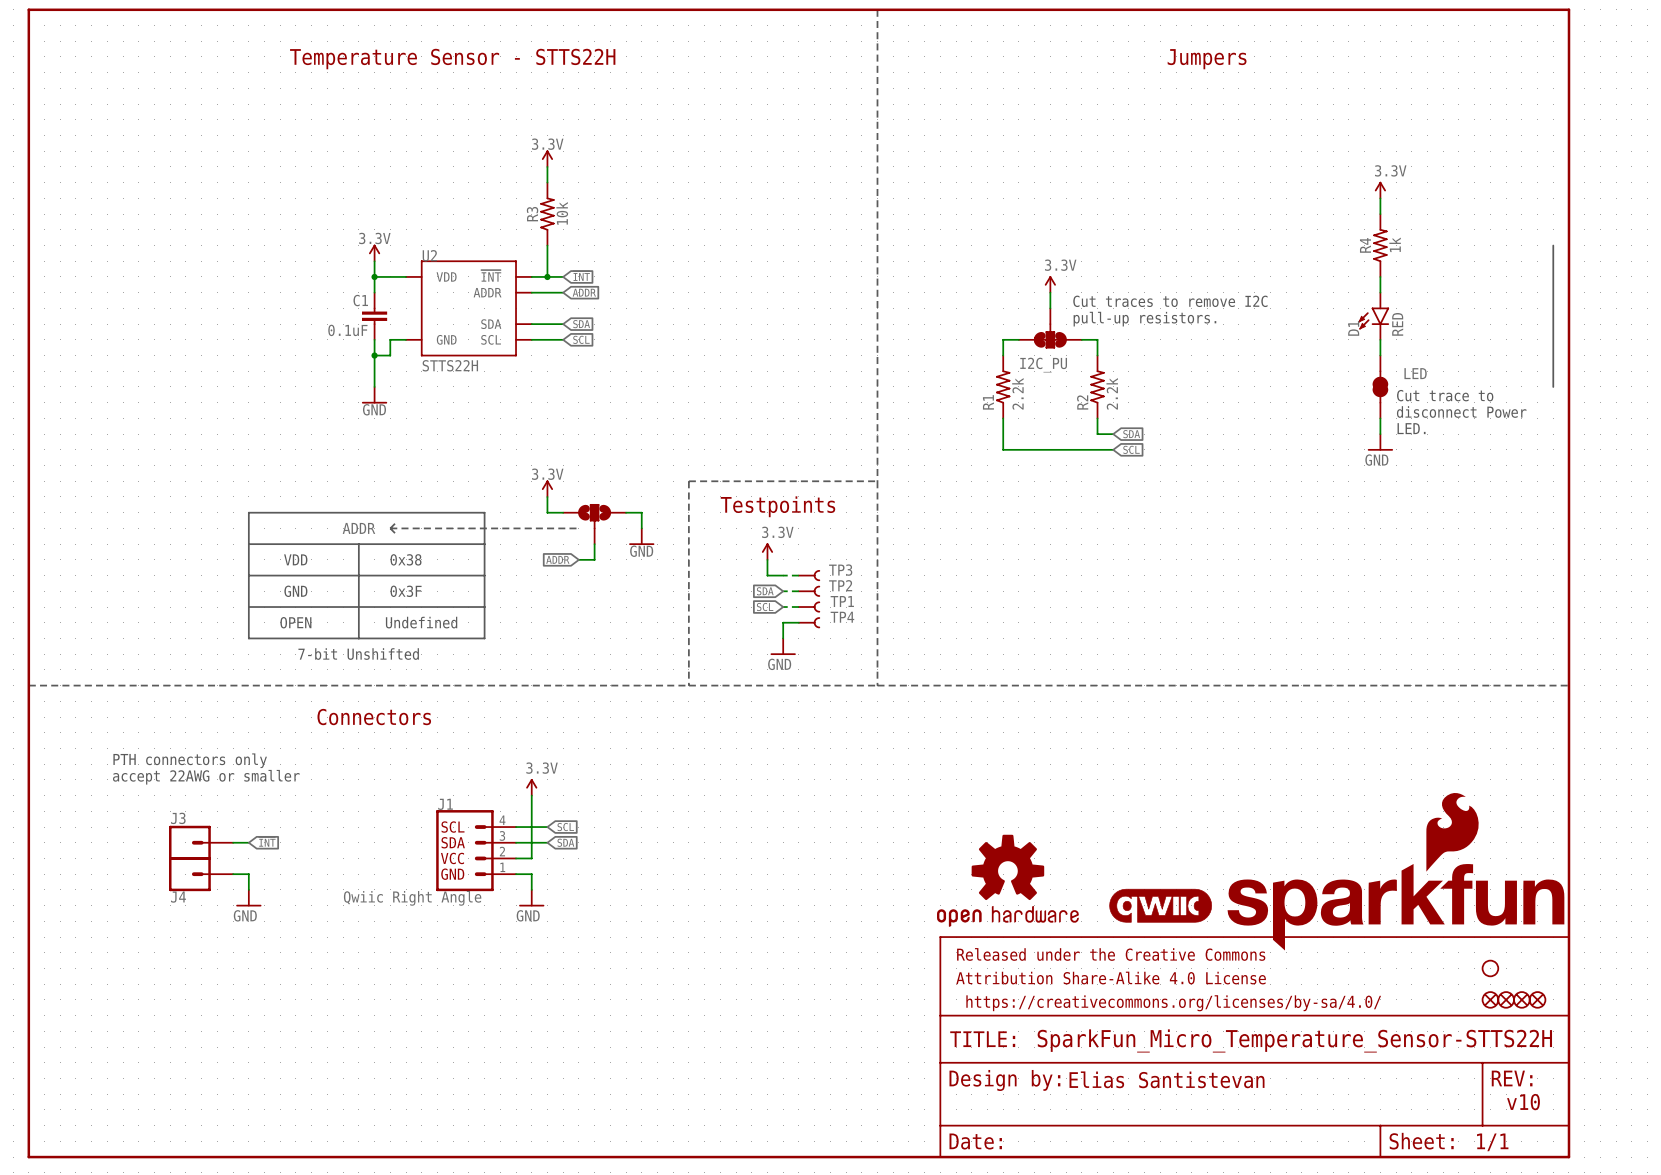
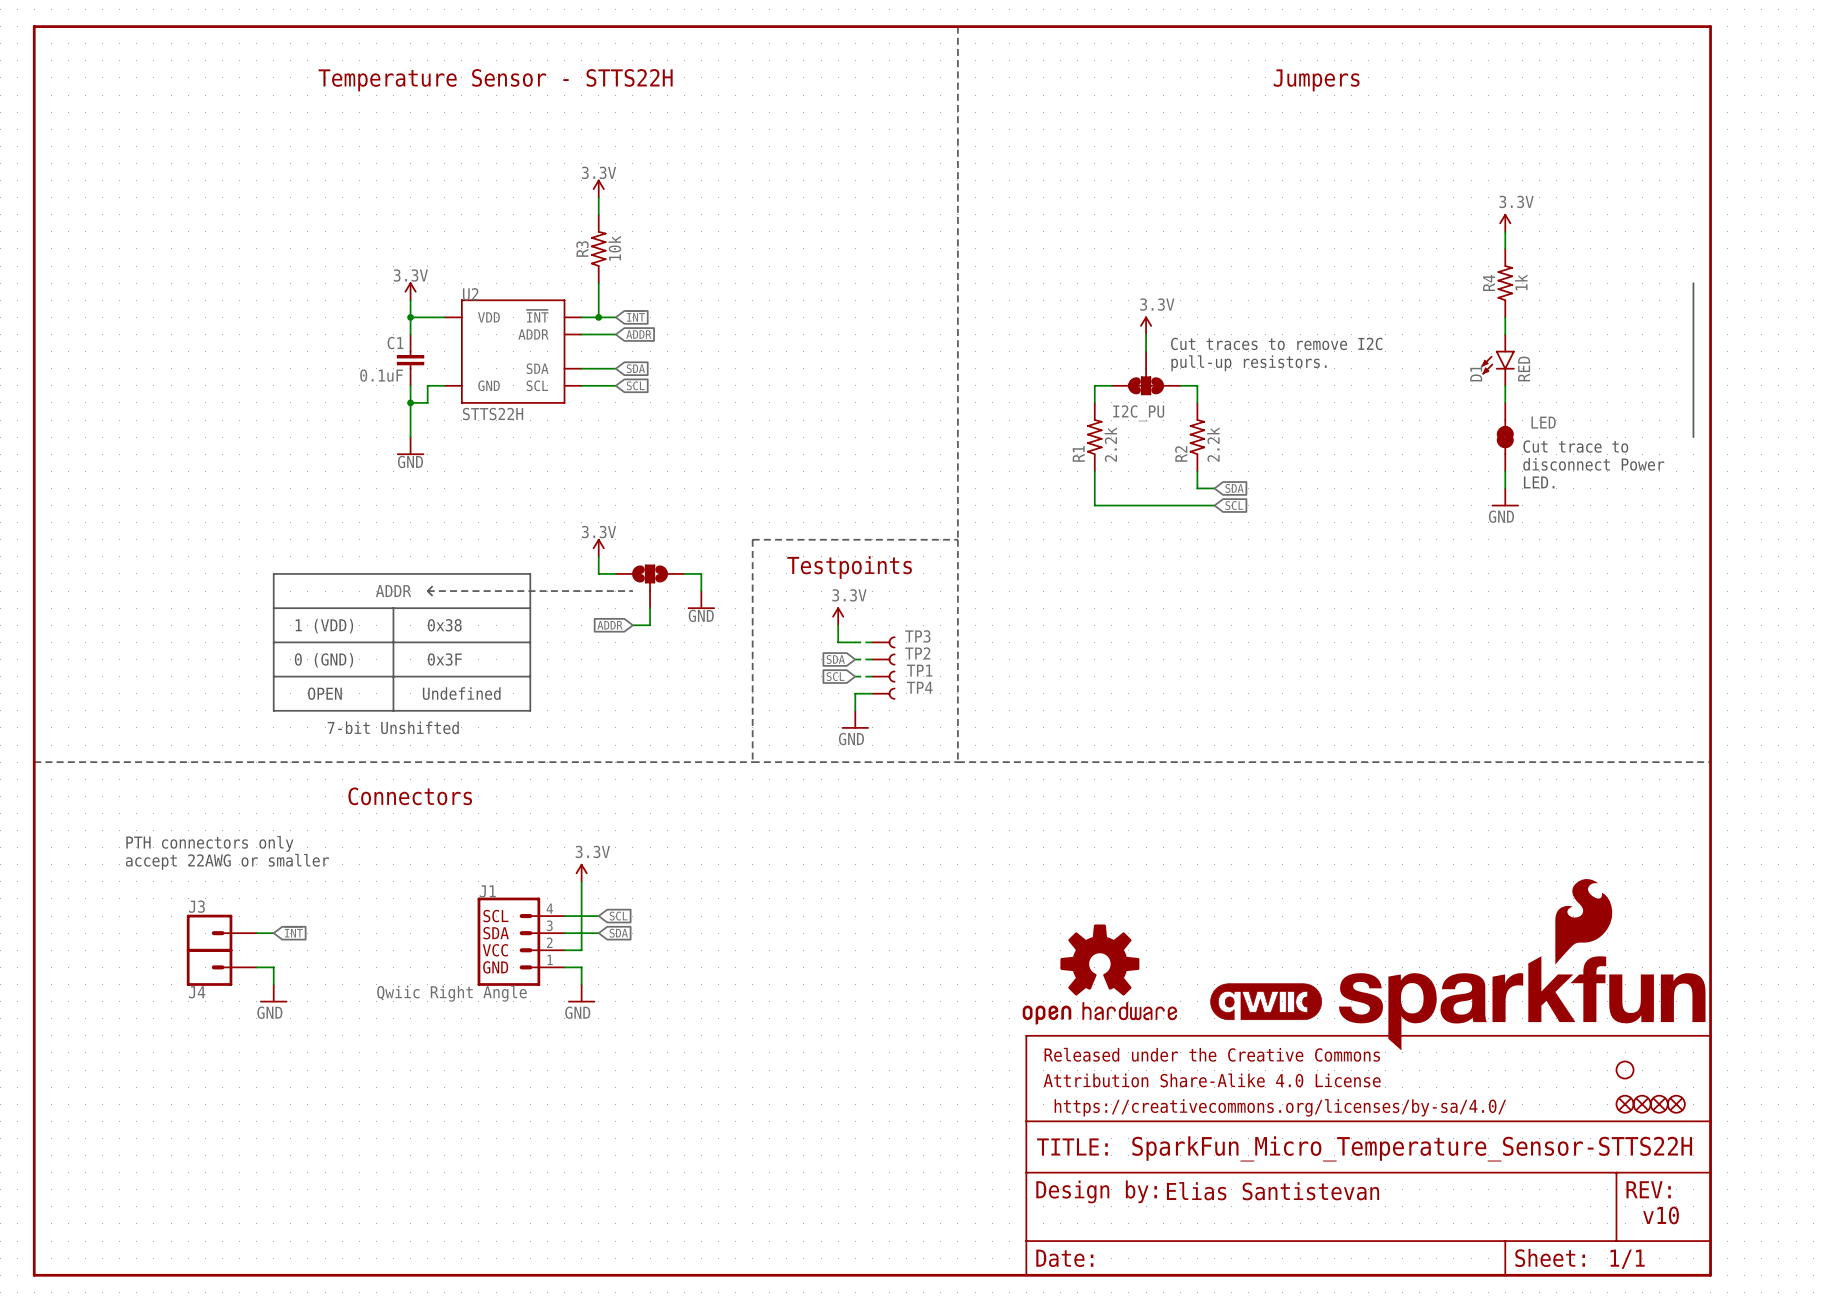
text: VDD (295, 559) -> 1 (VDD) (324, 626)
text: GND (295, 591) -> 0 (GND) (323, 660)

